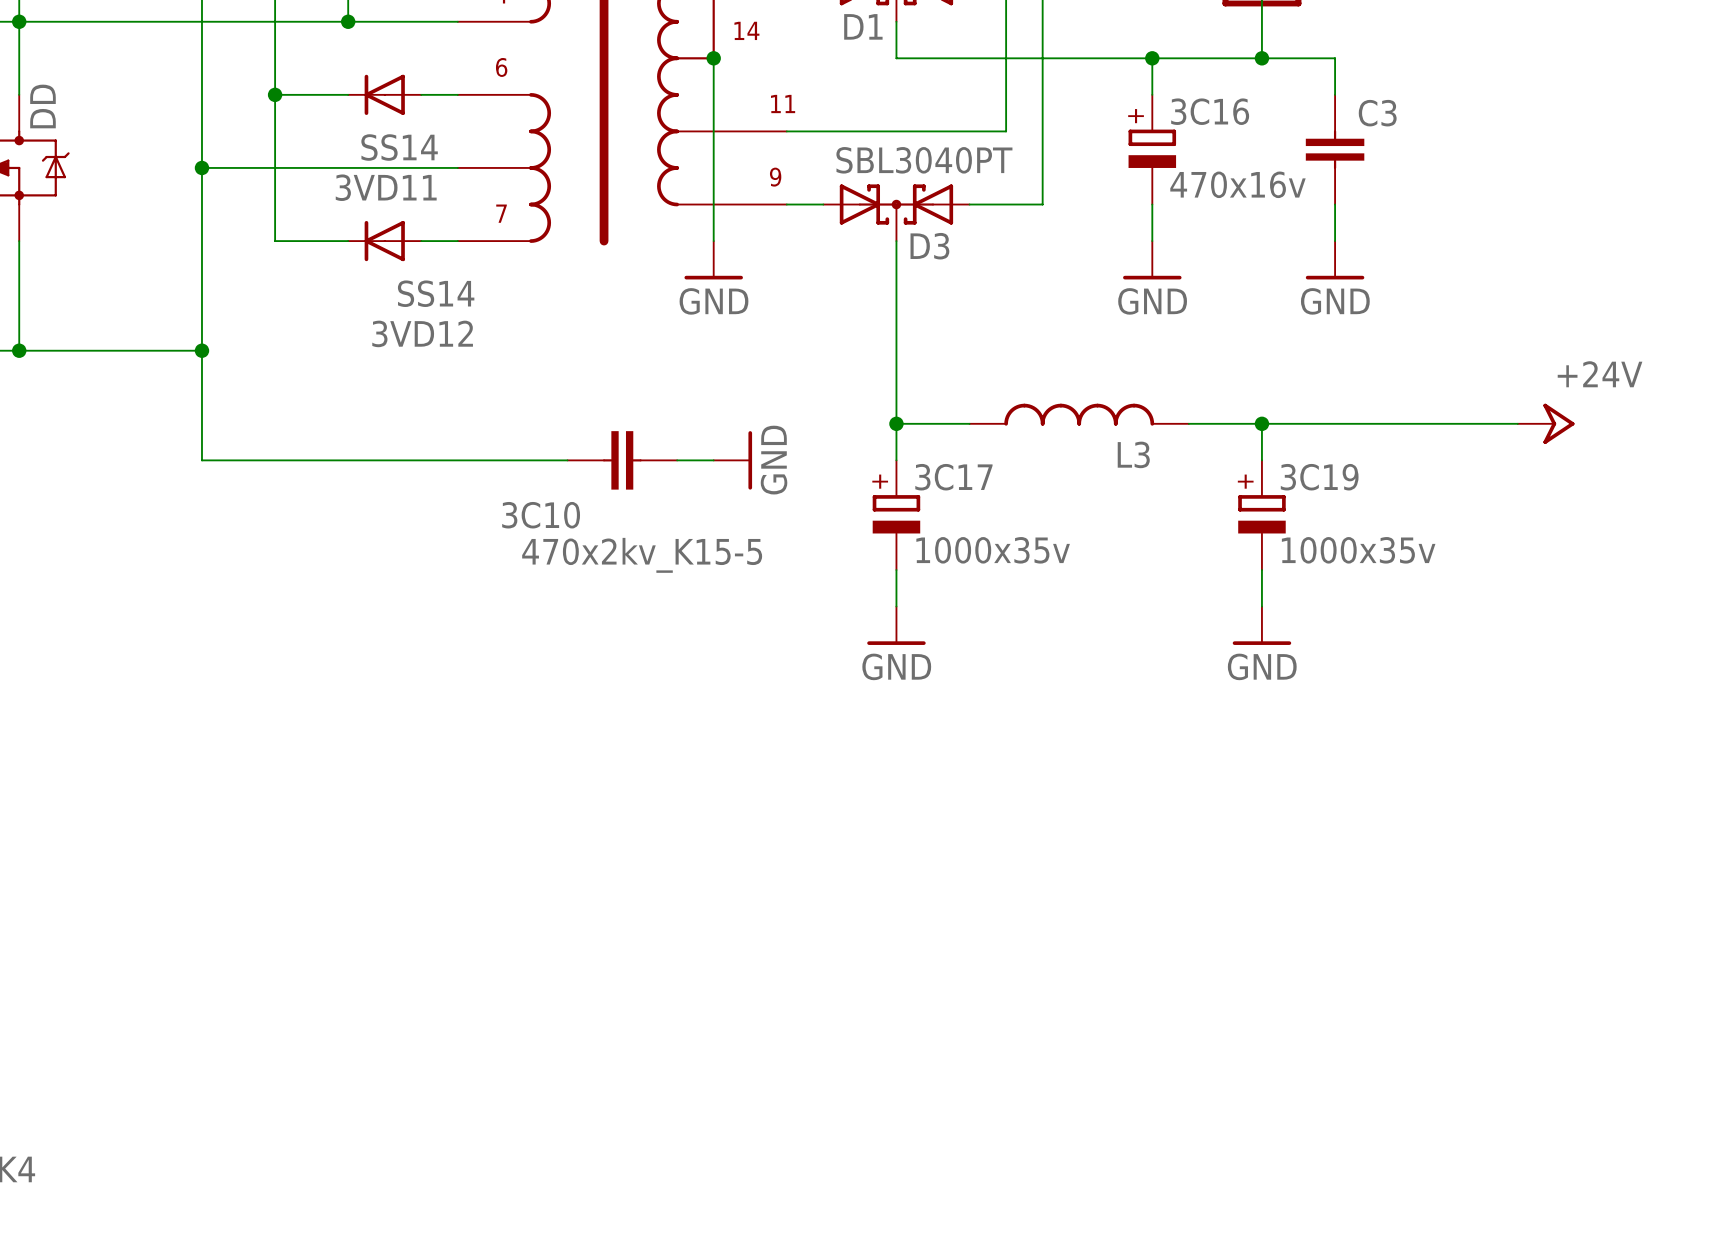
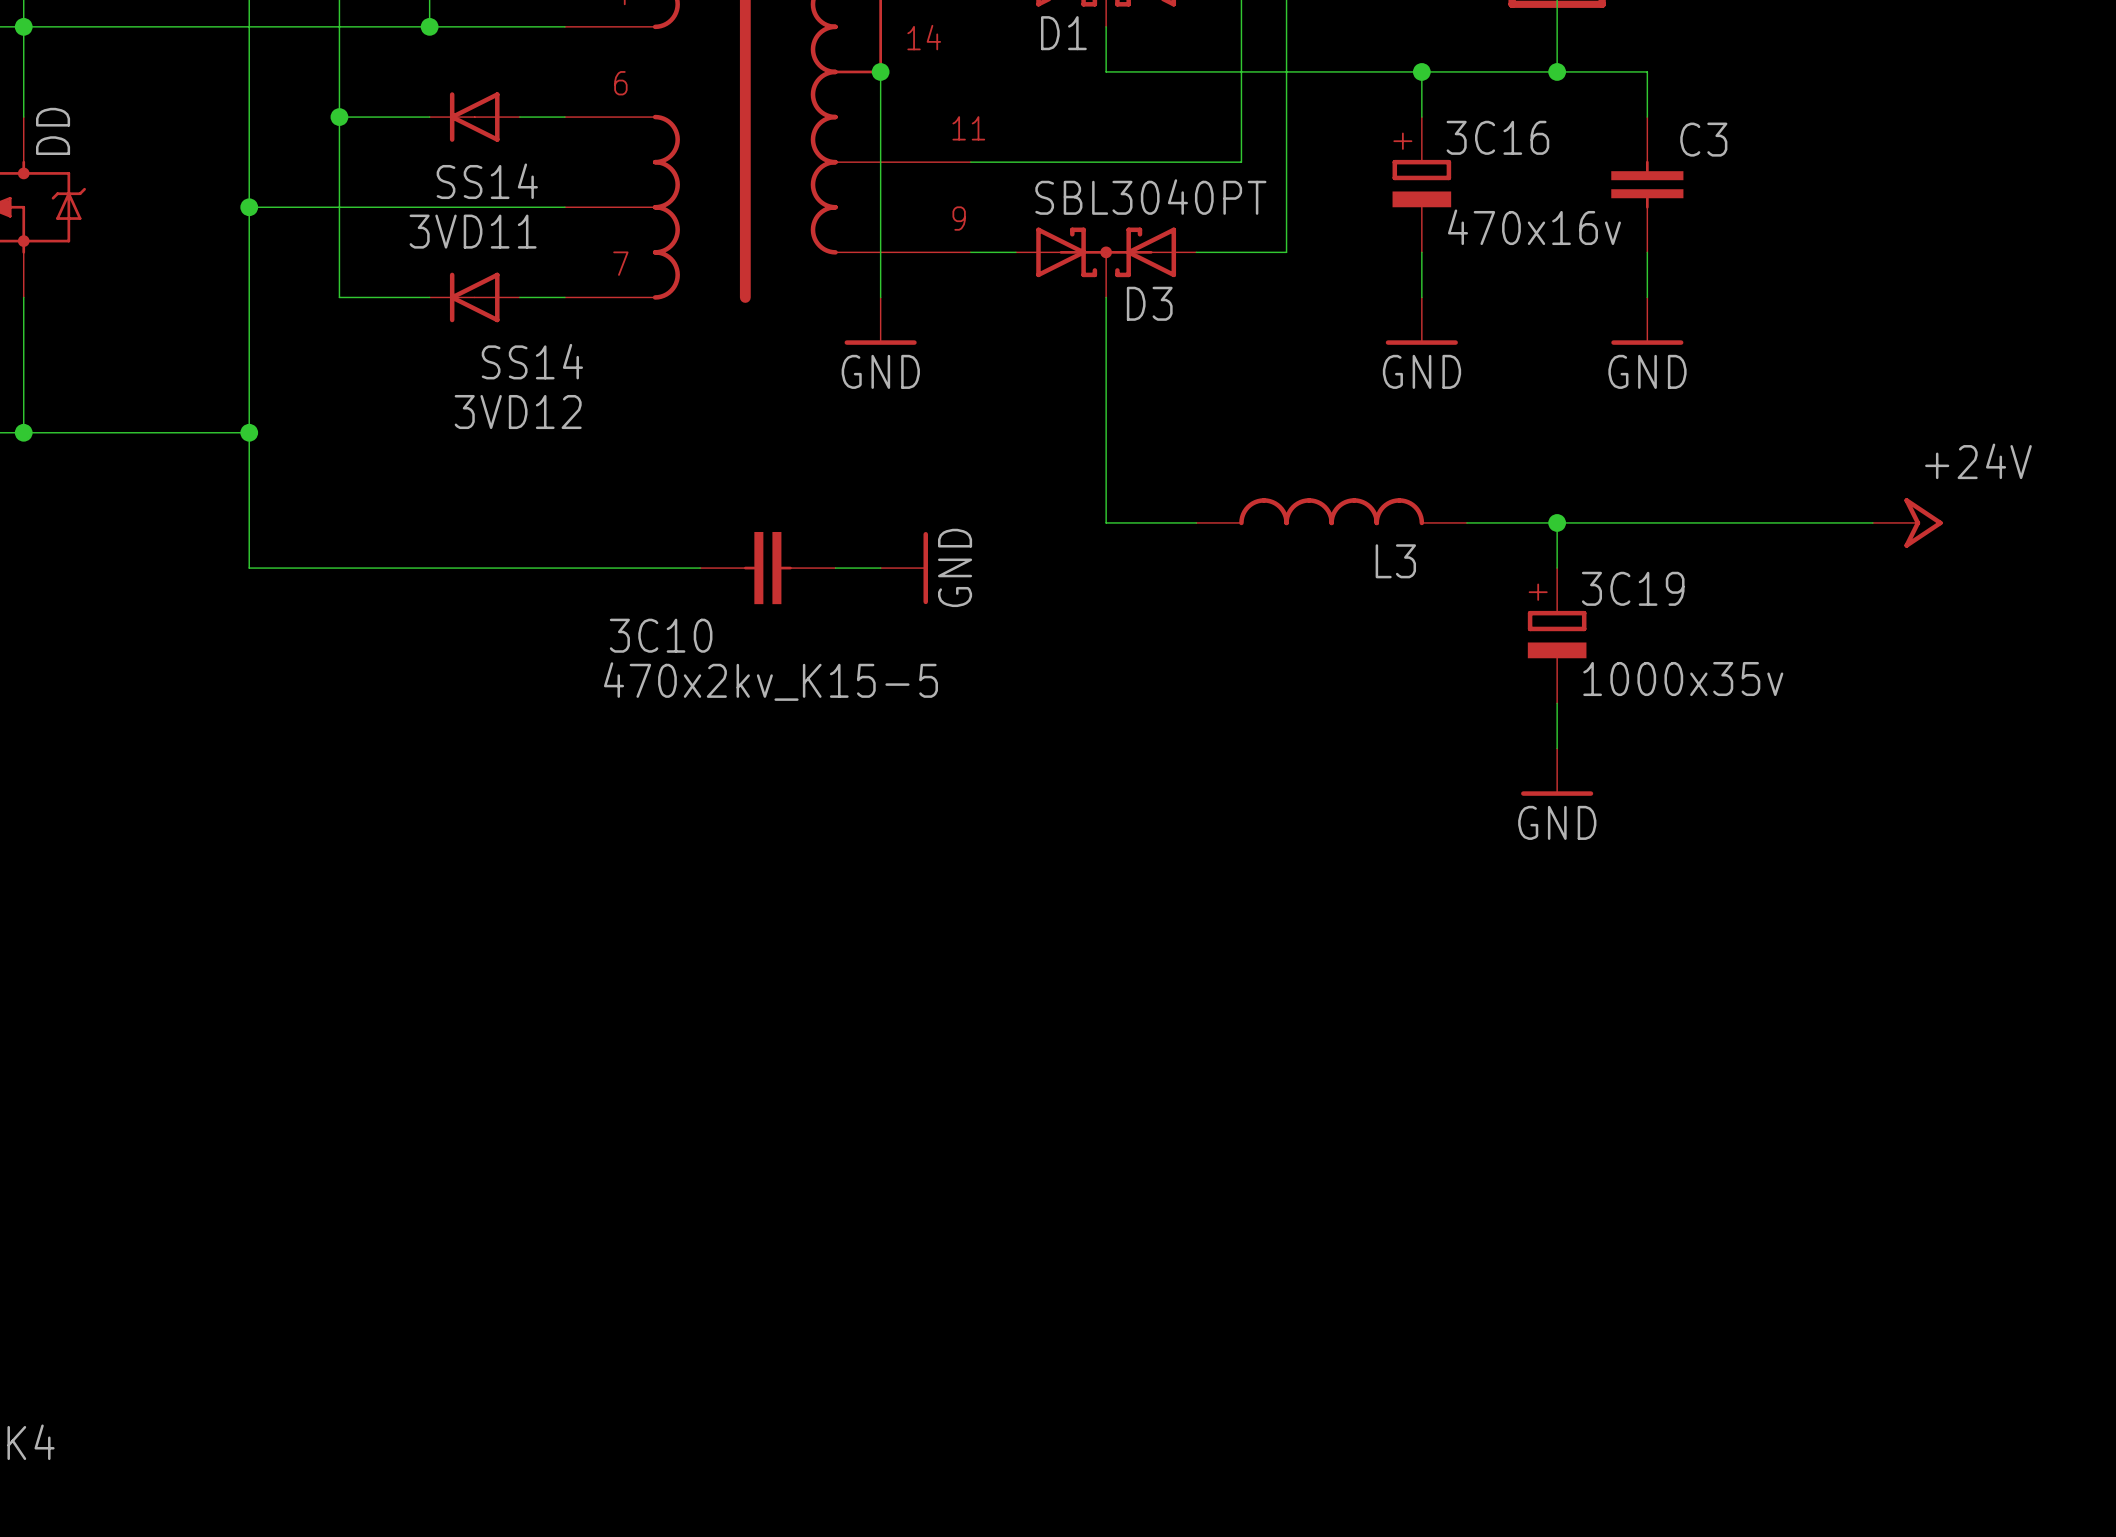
wire: (896, 423) (896, 460) -> none
junction: (896, 423) -> none
3C17: 1000x35v (896, 515) -> none
wire: (896, 570) (896, 606) -> none
power symbol: GND (896, 625) -> none

